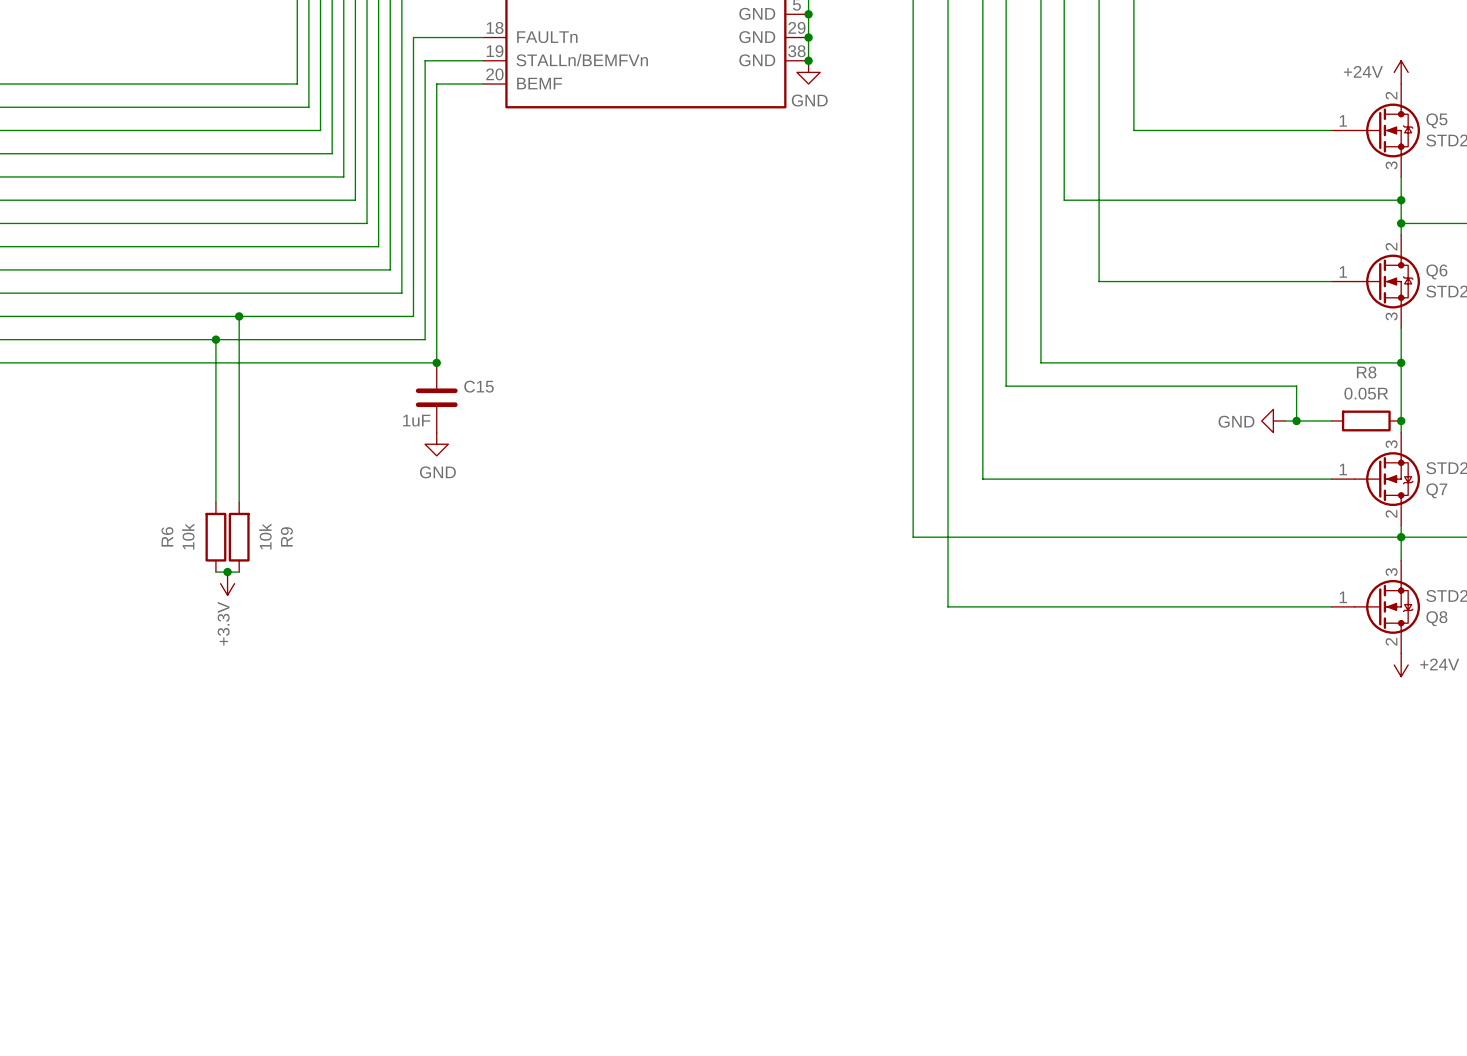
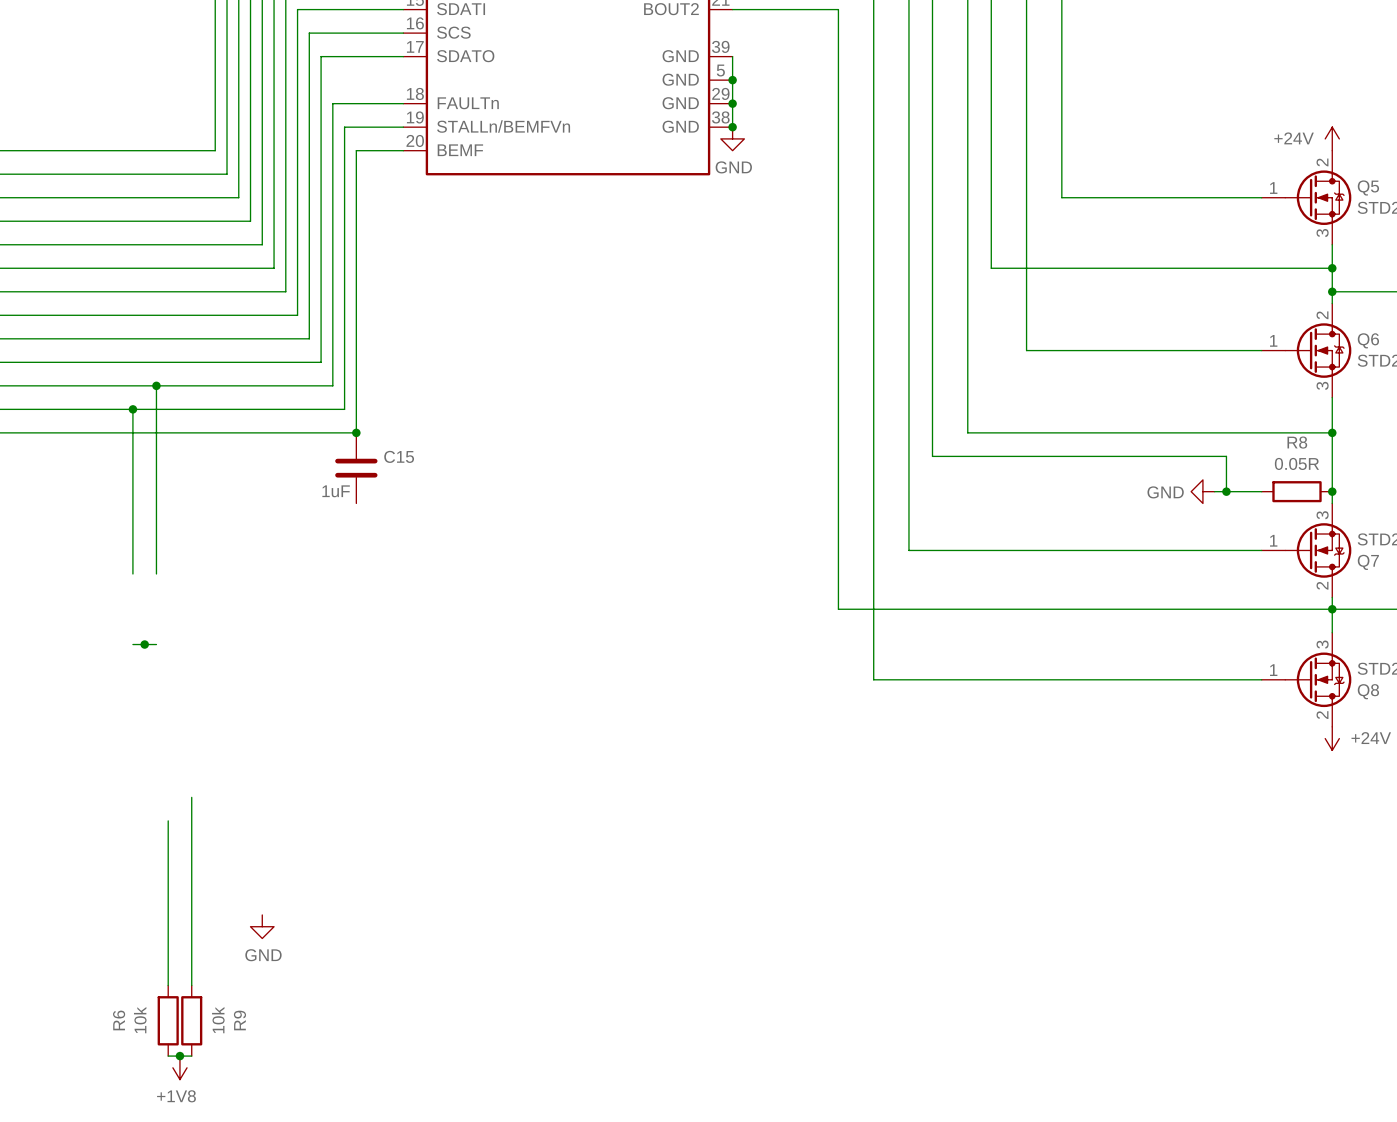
power symbol: GND (436, 444) -> none
R6 position: (215, 537) -> (168, 1020)
R9 position: (239, 537) -> (191, 1020)
power symbol: +3.3V (227, 583) -> none
wire: none -> (191, 797) (191, 985)
wire: none -> (168, 820) (168, 985)
power symbol: none -> GND (262, 926)
wire: none -> (168, 1056) (191, 1056)
junction: none -> (179, 1056)
power symbol: none -> +1V8 (179, 1067)

